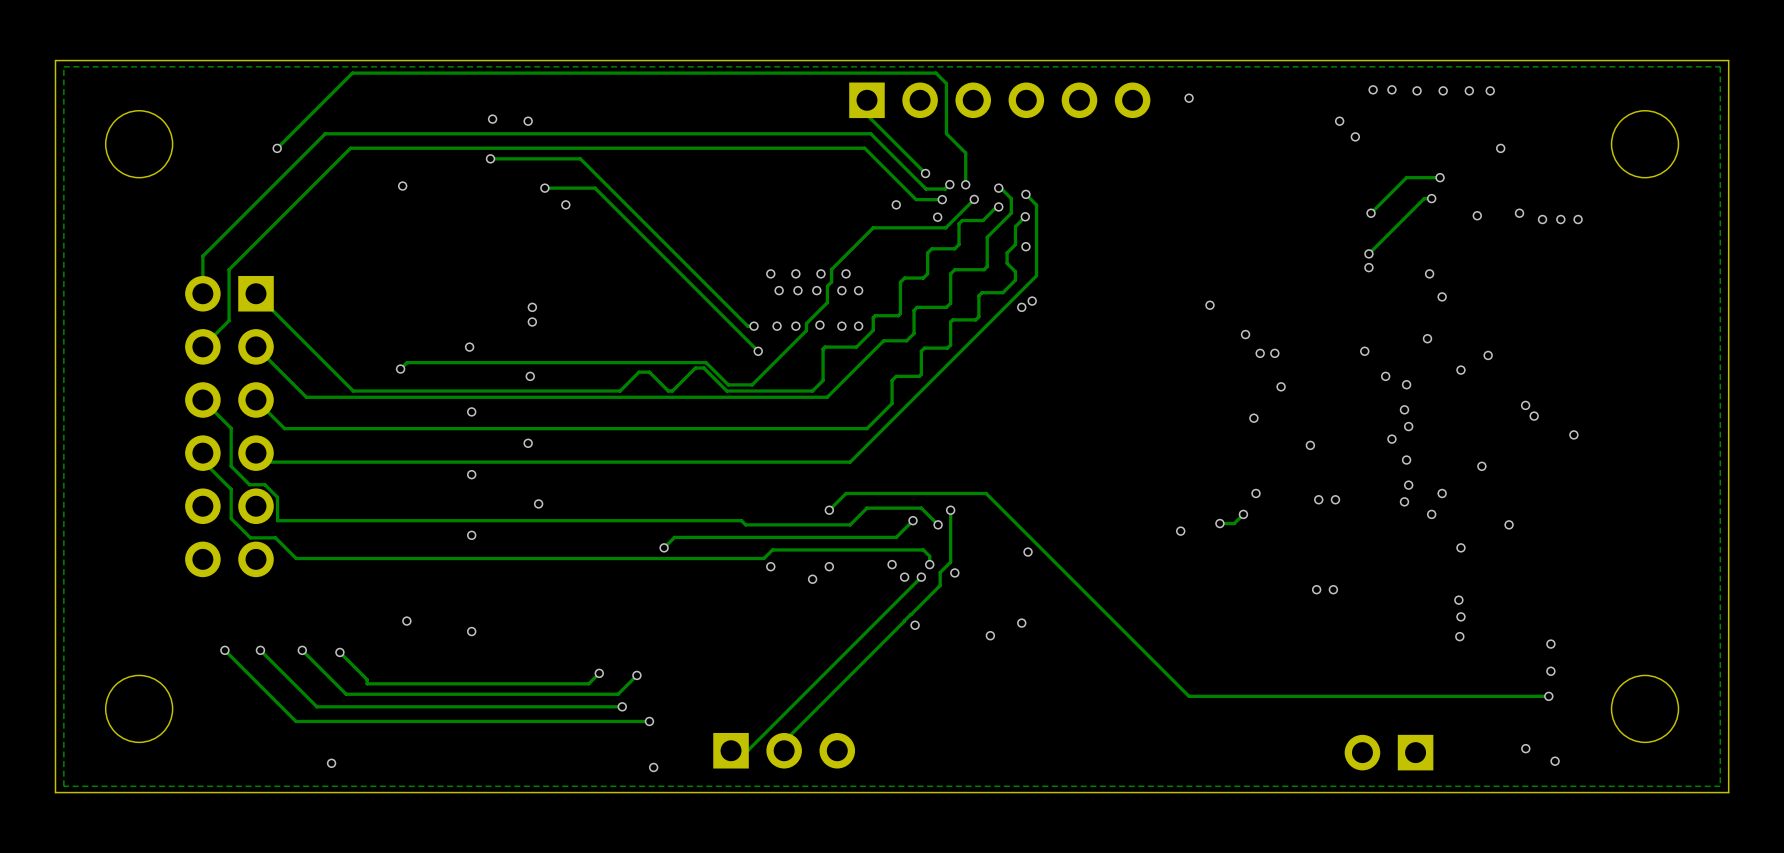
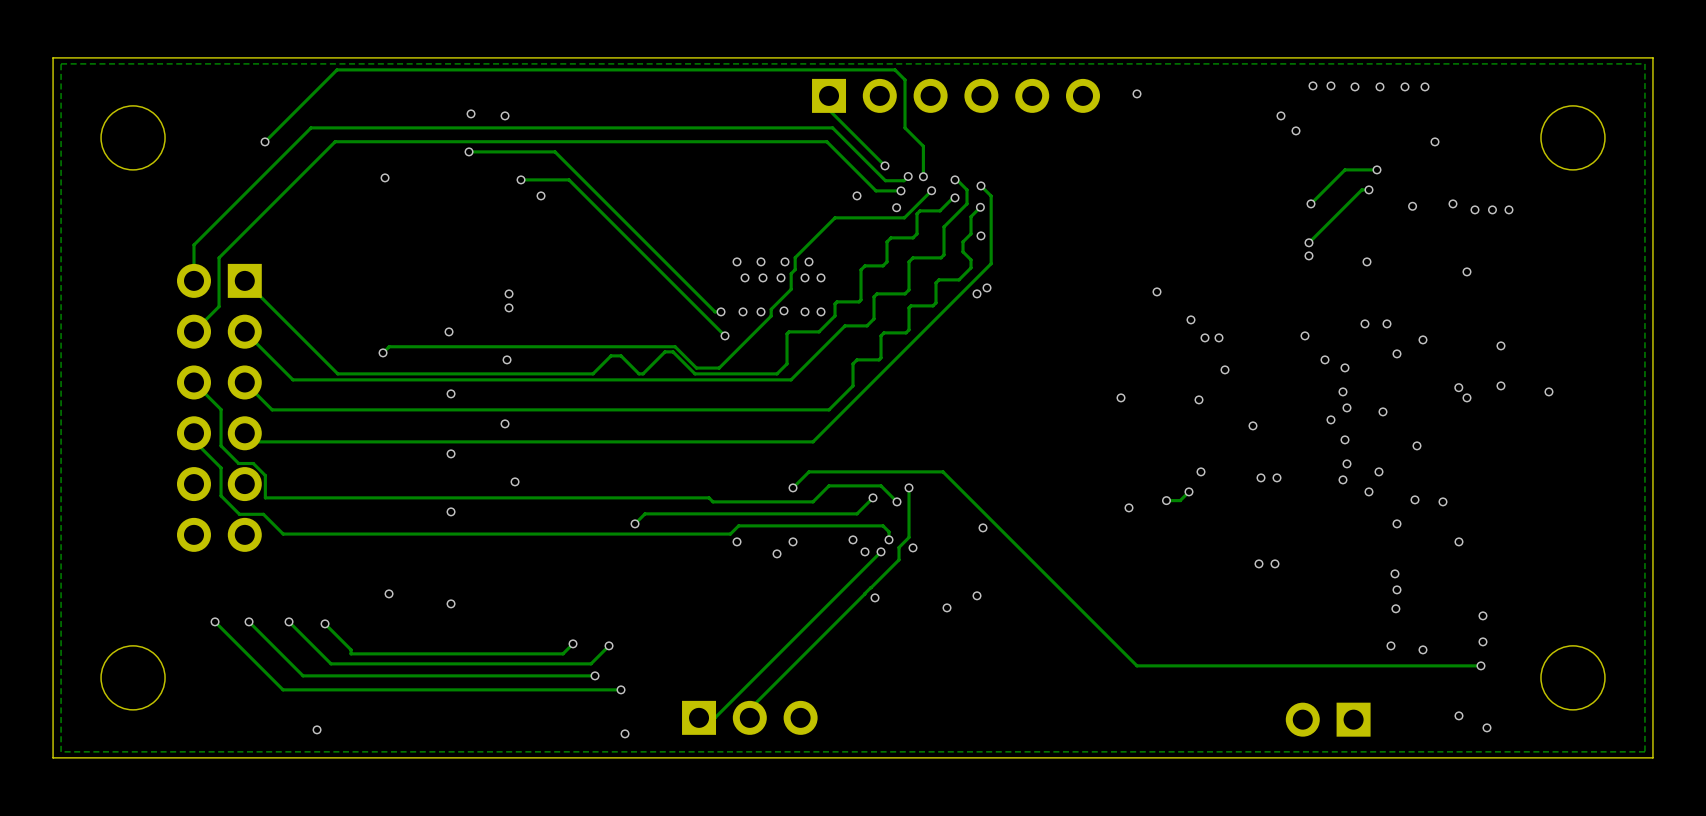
via: none -> (1466, 271)
via position: (1442, 296) -> (1386, 323)
via: none -> (1500, 345)
via: none -> (1500, 385)
via: none -> (1548, 391)
via: none -> (1121, 397)
via: none -> (1382, 411)
via: (1573, 434) -> none
via: none -> (1414, 499)
via: none -> (1458, 541)
via: none -> (1390, 645)
via: none -> (1422, 649)

